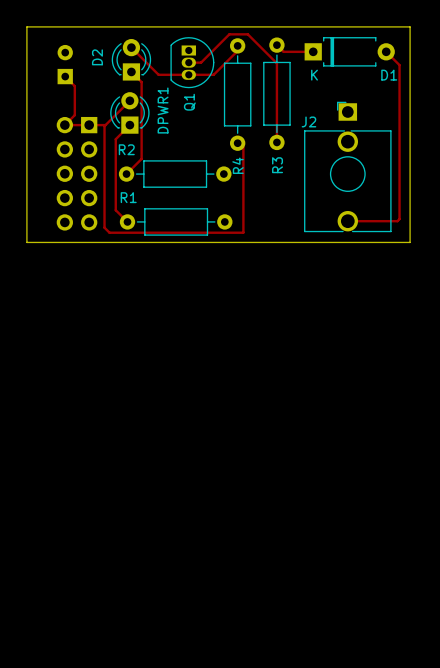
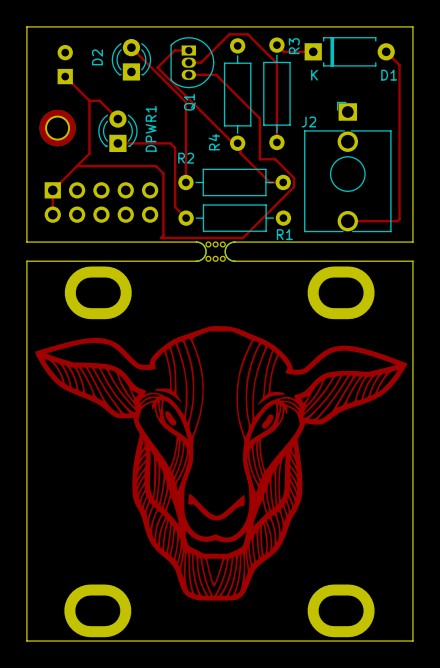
board edge: (410, 26) (410, 242) (26, 242) -> (410, 26) (412, 26) (412, 242) (234, 242) (227, 245) (225, 251) (228, 258) (234, 261) (412, 261) (412, 641) (26, 641) (26, 261) (196, 261) (202, 258) (206, 251) (202, 244) (196, 242) (26, 242)
top track: (243, 45) (213, 74) -> (77, 166) (156, 166) (163, 173) (163, 235) (160, 238) (242, 238) (294, 186) (294, 178) (275, 159) (259, 159) (259, 118) (216, 74) (213, 74)
top track: none -> (188, 50) (174, 50) (157, 67) (232, 142) (240, 142) (240, 153) (269, 182) (283, 182)
top track: (131, 71) (141, 82) (141, 158) (126, 174) -> none
top track: (158, 74) (188, 74) -> (158, 74) (185, 102) (185, 182)
top track: (74, 86) (74, 115) (64, 125) (105, 125) -> (74, 86) (89, 100)
top track: none -> (89, 100) (89, 153) (52, 190) (52, 214)
top track: none -> (89, 100) (99, 100) (117, 119)
top track: (129, 100) (104, 126) (104, 227) (109, 232) (243, 232) (243, 142) -> none
DPWR1 position: (129, 112) -> (117, 131)
top track: (129, 125) (115, 139) (115, 210) (127, 221) -> none
part: none -> (57, 128)
top track: none -> (117, 143) (170, 143) (175, 147) (175, 207) (186, 218)
R4 name position: R4 (238, 165) -> R4 (214, 142)
R3 name position: R3 (277, 165) -> R3 (294, 46)
part rotation: 0° (77, 173) -> 90° counterclockwise (101, 202)
R2 position: (175, 174) -> (234, 182)
R1 name position: R1 (128, 197) -> R1 (284, 234)
R1 position: (176, 221) -> (234, 218)
part: none -> (215, 251)
part: none -> (98, 292)
part: none -> (341, 292)
drawing: none -> [35, 326, 408, 601]
part: none -> (97, 610)
part: none -> (341, 610)

